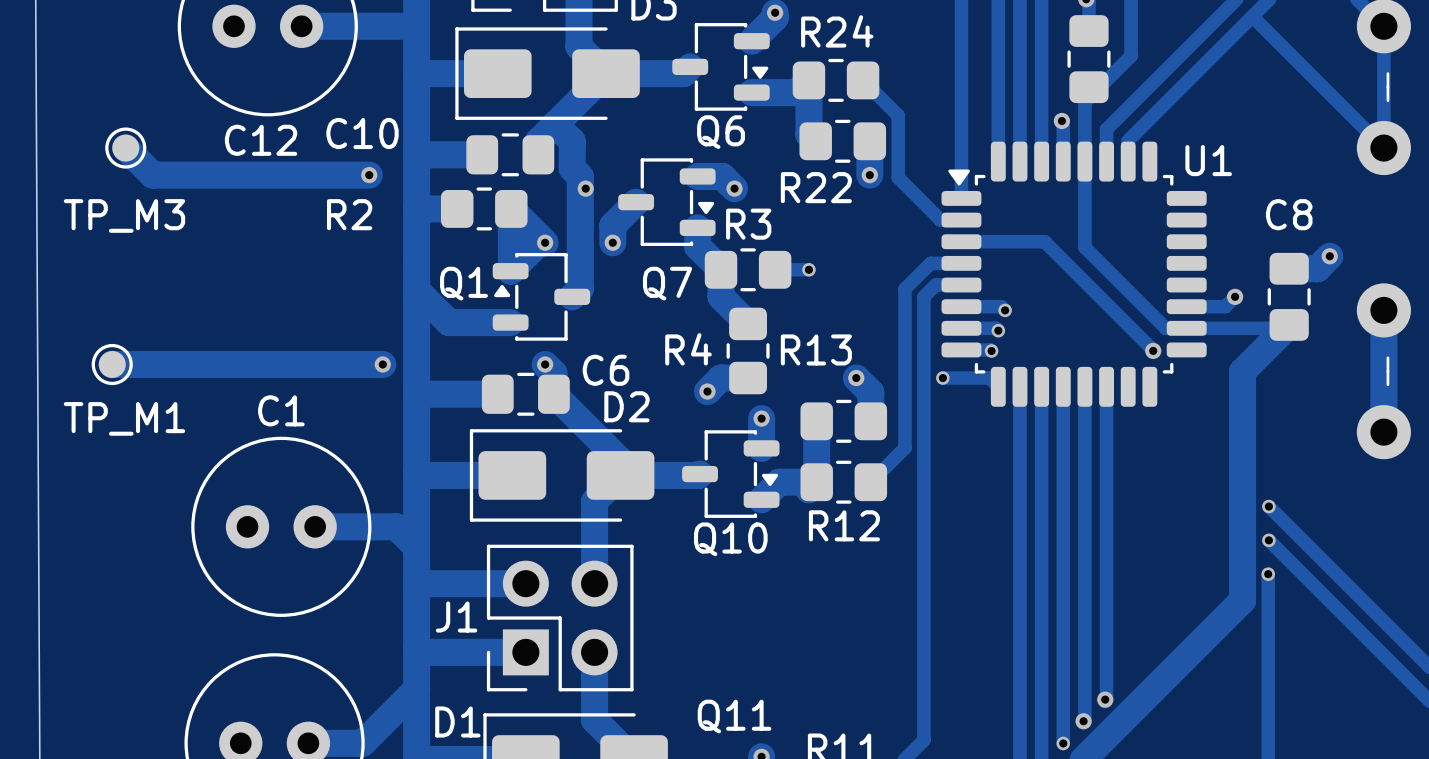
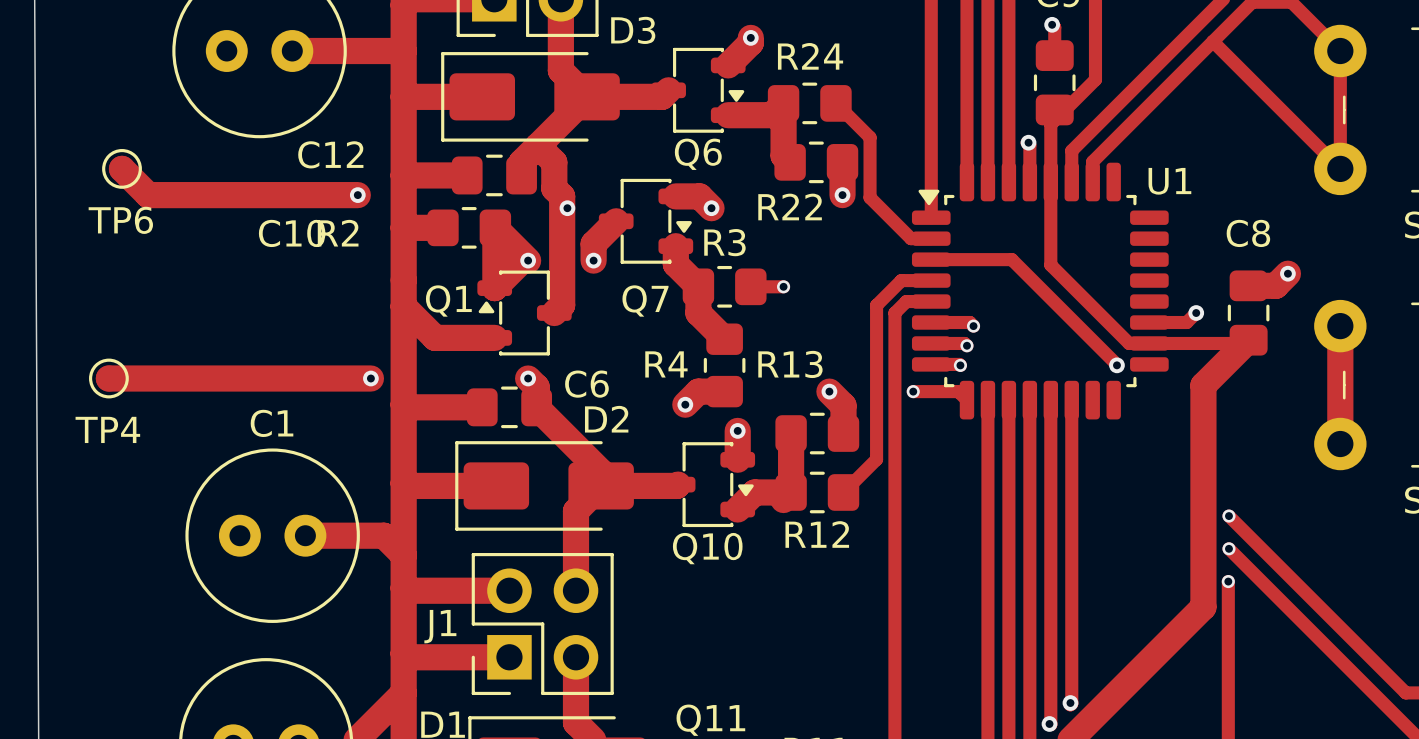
C10 name position: C10 (362, 133) -> C10 (292, 233)
C12 name position: C12 (261, 140) -> C12 (330, 154)
TP_M3 name: TP_M3 (124, 215) -> TP6 (120, 220)
TP_M1 name: TP_M1 (124, 418) -> TP4 (107, 429)

